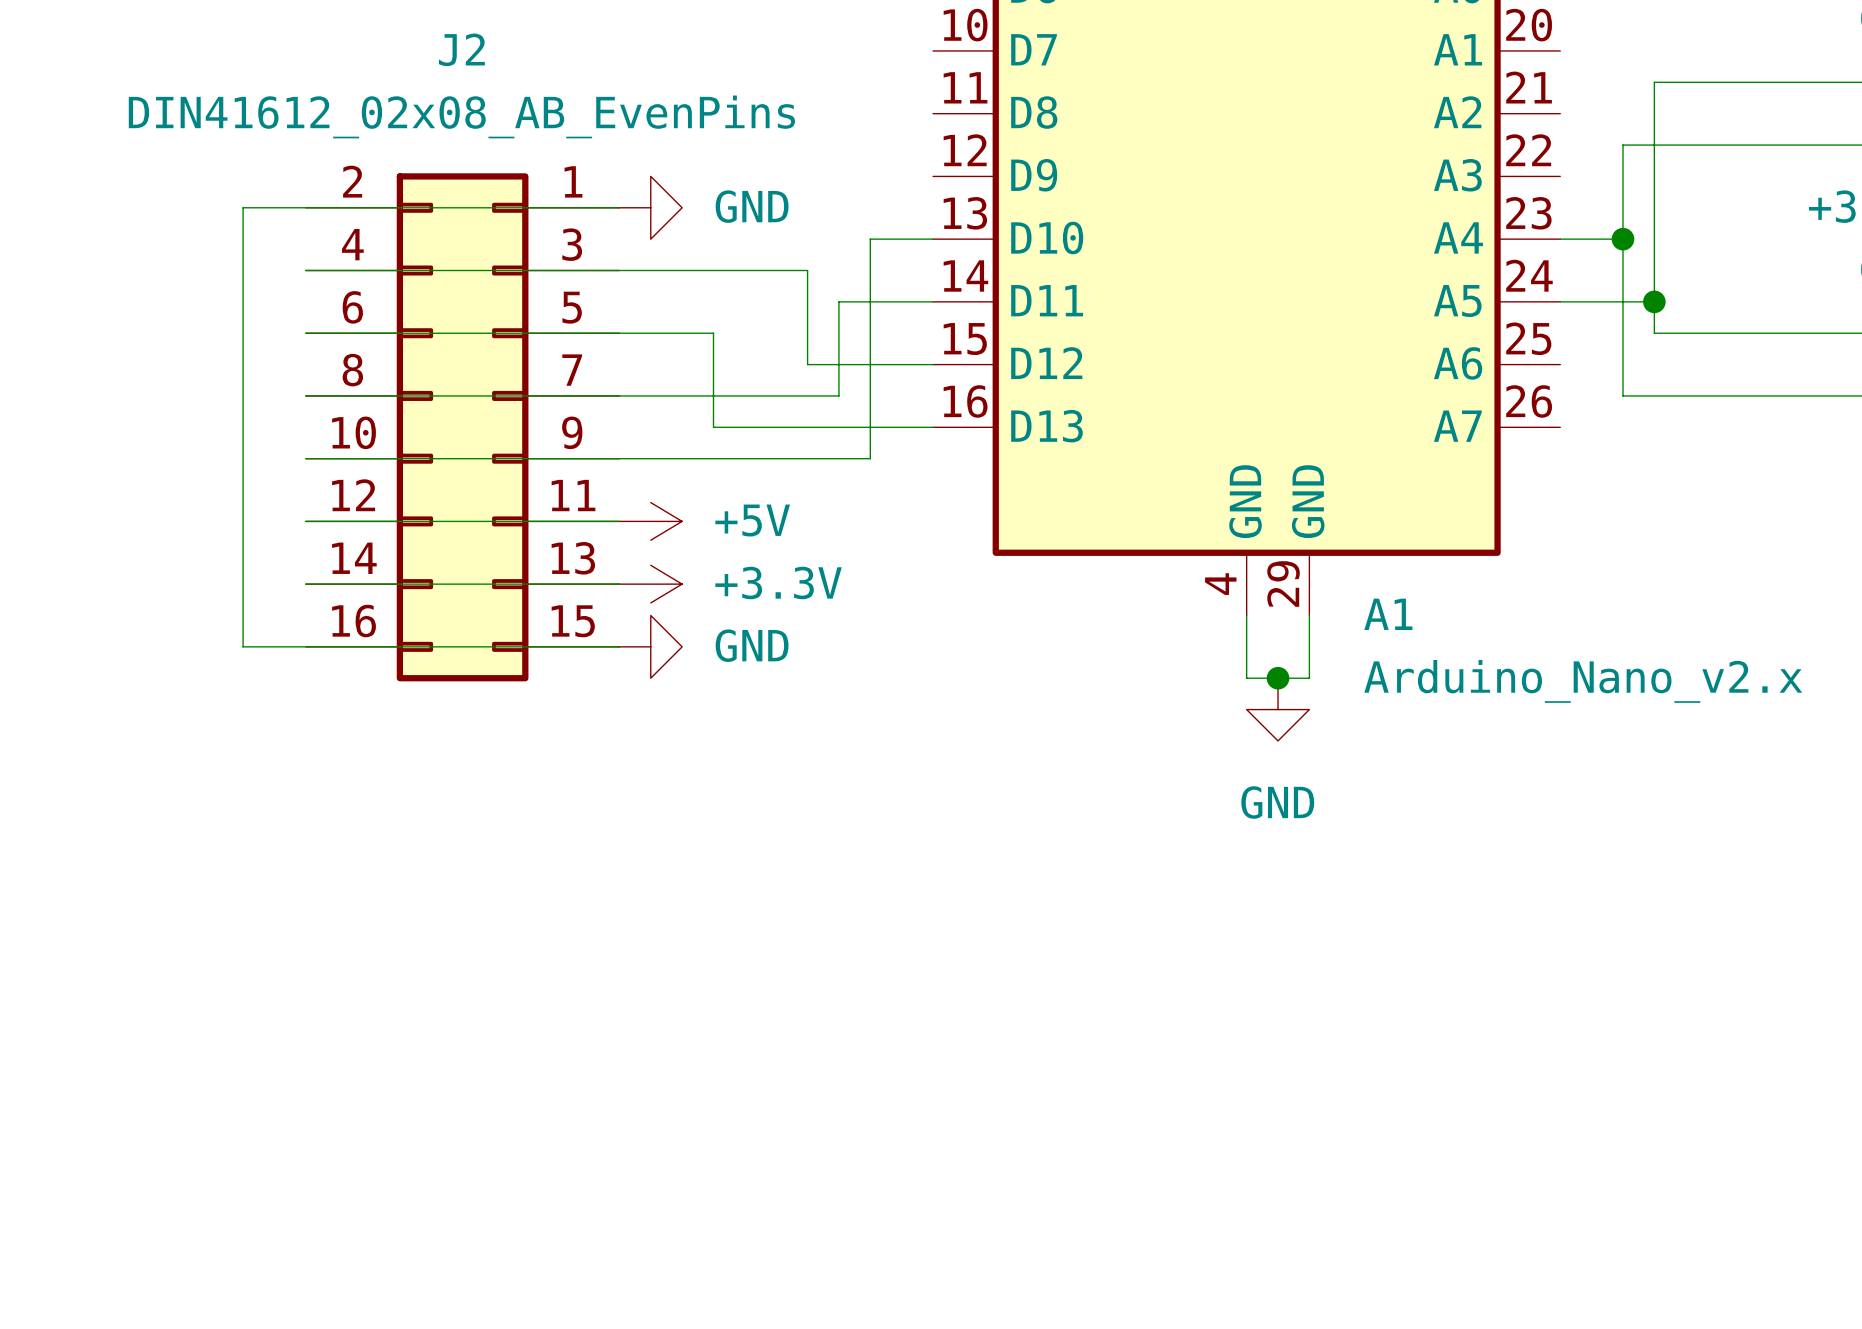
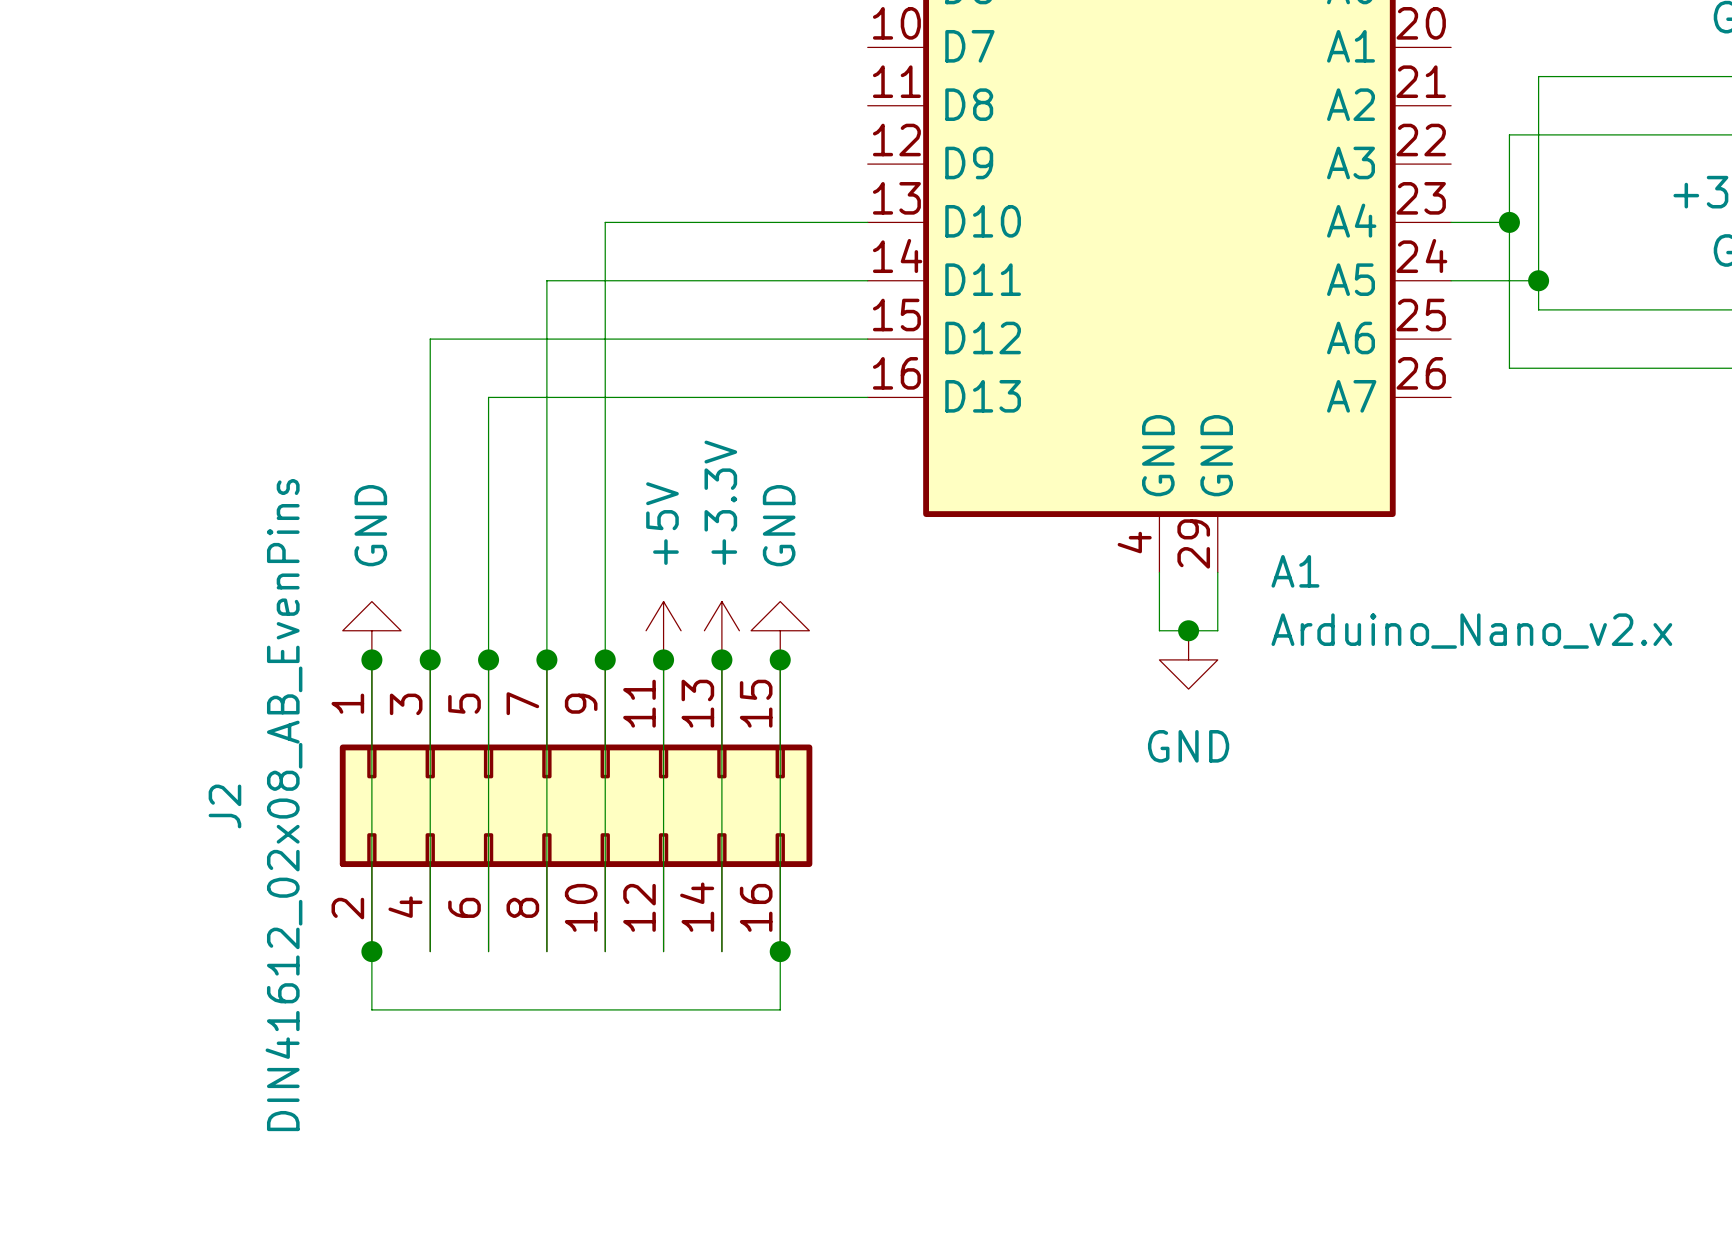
wire: (619, 207) (243, 207) (243, 646) (619, 646) -> none
power symbol: GND (650, 207) -> none
wire: (870, 239) (870, 458) (305, 458) -> (809, 222) (605, 222) (605, 951)
wire: (305, 270) (807, 270) (807, 364) -> (430, 951) (430, 339) (751, 339)
wire: (838, 301) (838, 395) (305, 395) -> (780, 280) (546, 280) (546, 951)
wire: (305, 333) (713, 333) (713, 427) -> (488, 951) (488, 397) (663, 397)
J2 rotation: 0° (462, 427) -> 90° counterclockwise (576, 805)
J2 position: (462, 427) -> (576, 805)
wire: (305, 521) (619, 521) -> none
power symbol rotation: 0° (650, 521) -> 90° counterclockwise (663, 630)
power symbol position: +5V (650, 521) -> +5V (663, 630)
wire: (305, 584) (619, 584) -> none
power symbol rotation: 0° (650, 584) -> 90° counterclockwise (721, 630)
power symbol position: +3.3V (650, 584) -> +3.3V (721, 630)
power symbol: GND (650, 646) -> none
power symbol: none -> GND (371, 630)
power symbol: none -> GND (780, 630)
wire: none -> (371, 659) (371, 1009) (780, 1009) (780, 659)
junction: none -> (371, 659)
junction: none -> (430, 659)
junction: none -> (488, 659)
junction: none -> (546, 659)
junction: none -> (605, 659)
wire: none -> (663, 659) (663, 951)
junction: none -> (663, 659)
wire: none -> (721, 659) (721, 951)
junction: none -> (721, 659)
junction: none -> (780, 659)
junction: none -> (371, 951)
junction: none -> (780, 951)

